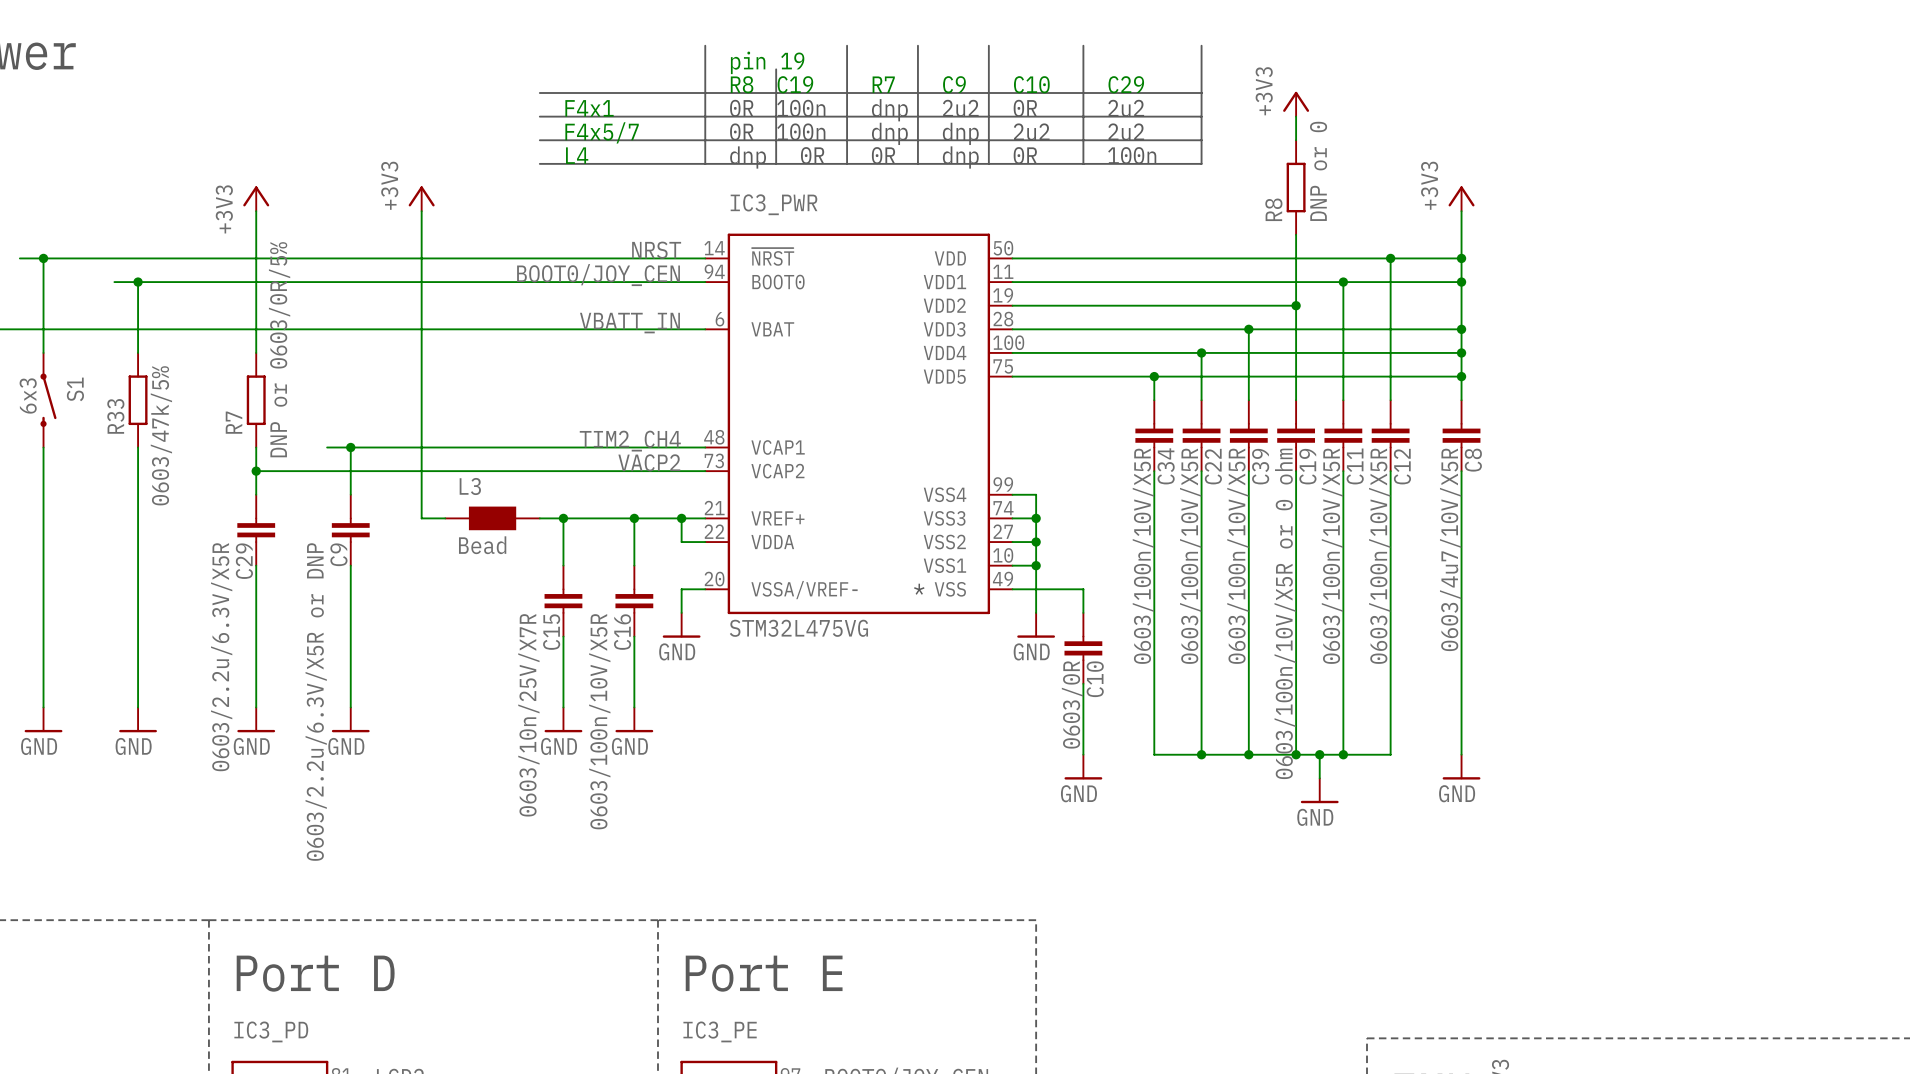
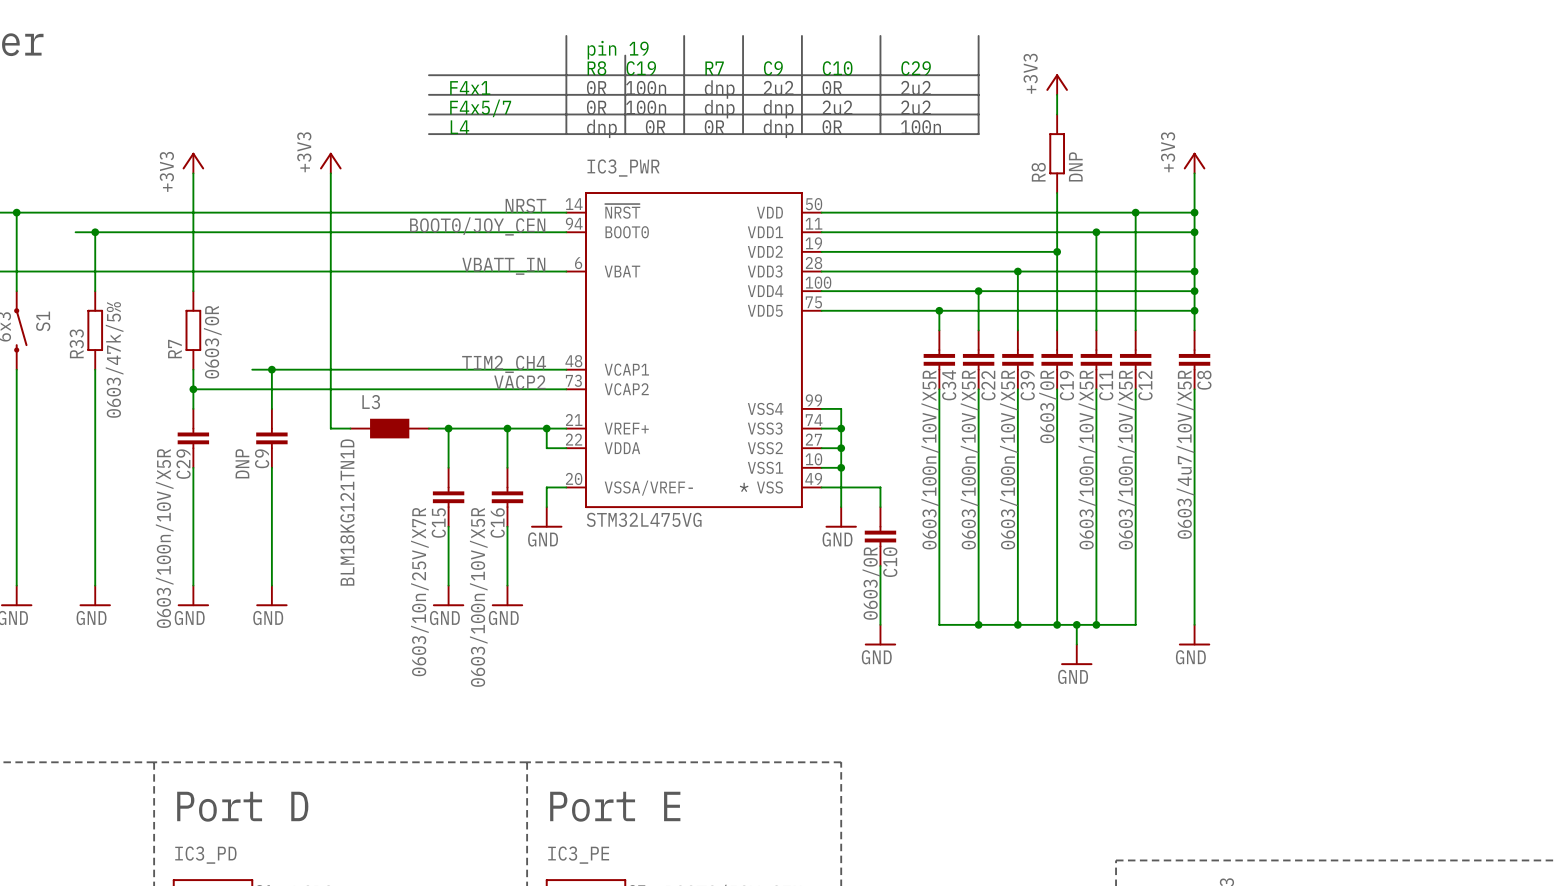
R8 value: DNP or 0 (1318, 171) -> DNP (1075, 166)
R7 value: DNP or 0603/0R/5% (279, 349) -> 0603/0R (212, 342)
L3 value: Bead (482, 545) -> BLM18KG121TN1D (347, 512)
C19 value: 0603/100n/10V/X5R or 0 ohm (1285, 613) -> 0603/0R (1048, 406)
C29 value: 0603/2.2u/6.3V/X5R (221, 657) -> 0603/100n/10V/X5R (164, 538)
C9 value: 0603/2.2u/6.3V/X5R or DNP (316, 702) -> DNP (242, 463)

